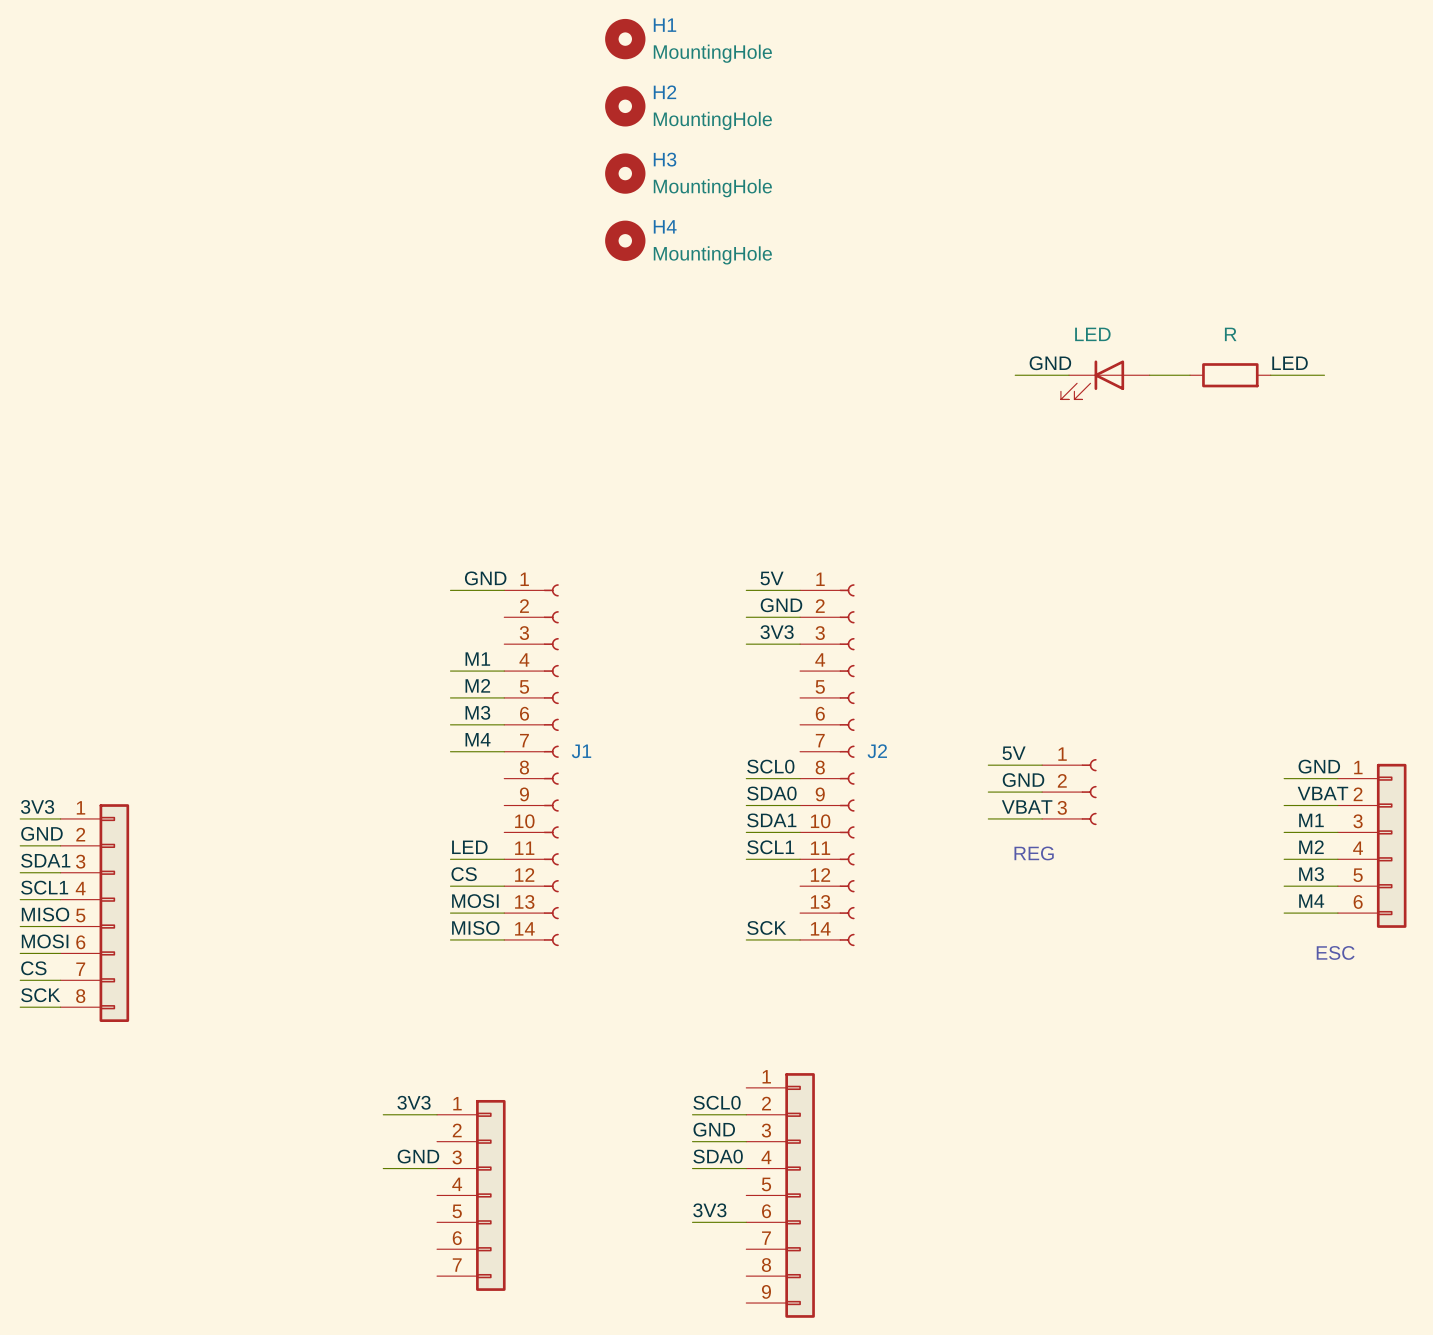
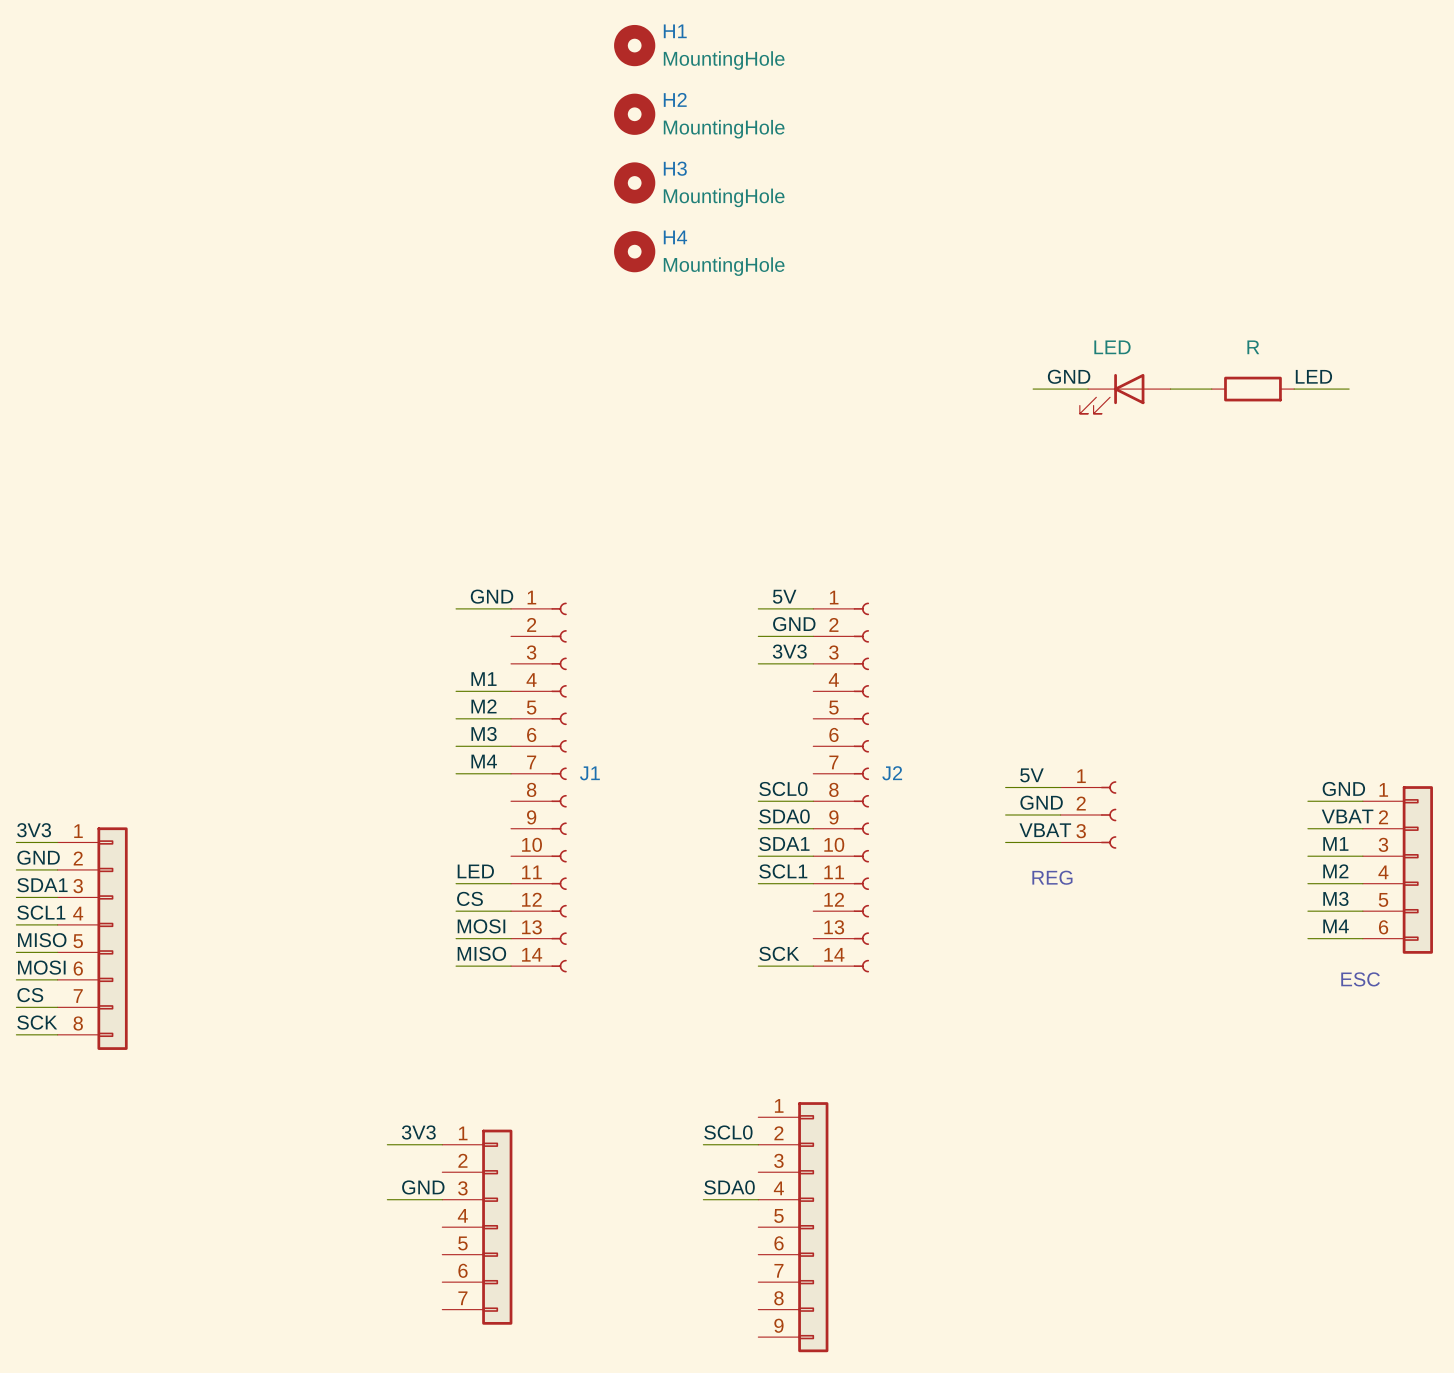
label: GND (714, 1129) -> none
wire: (692, 1141) (746, 1141) -> none
label: 3V3 (709, 1210) -> none
wire: (692, 1222) (746, 1222) -> none

